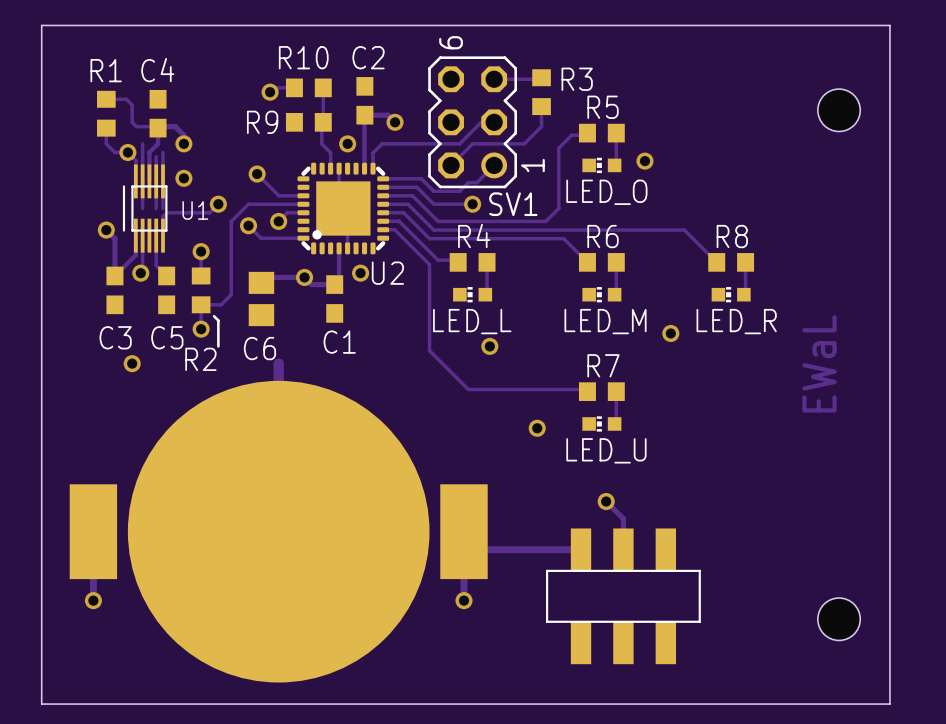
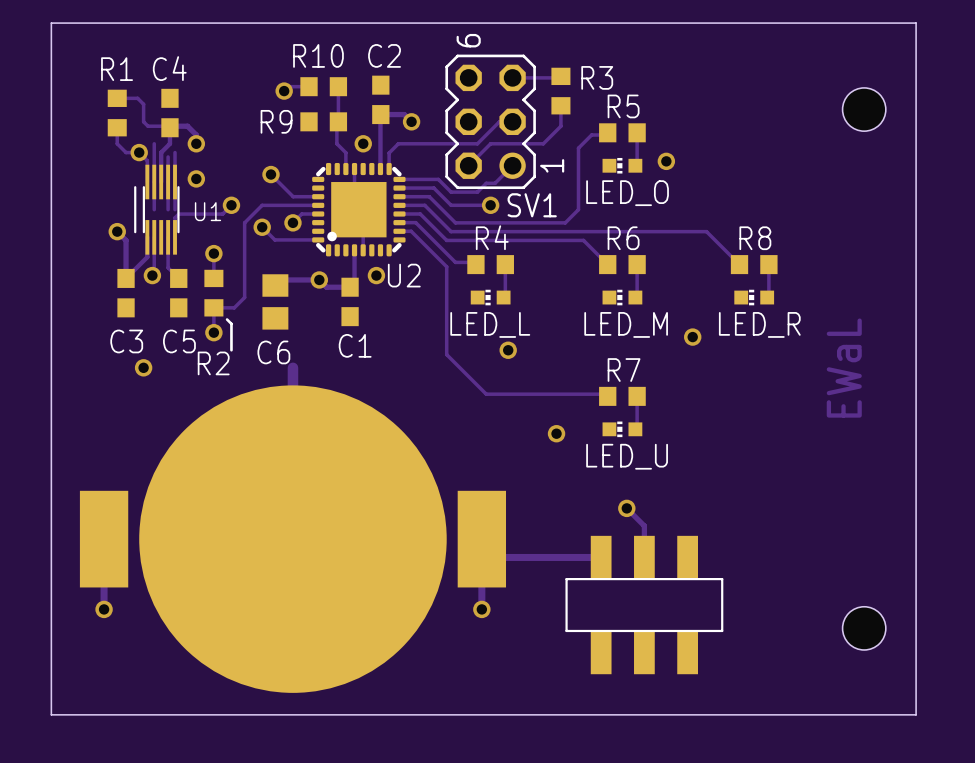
U1 footprint: [122, 164, 168, 253] -> [134, 164, 180, 255]

